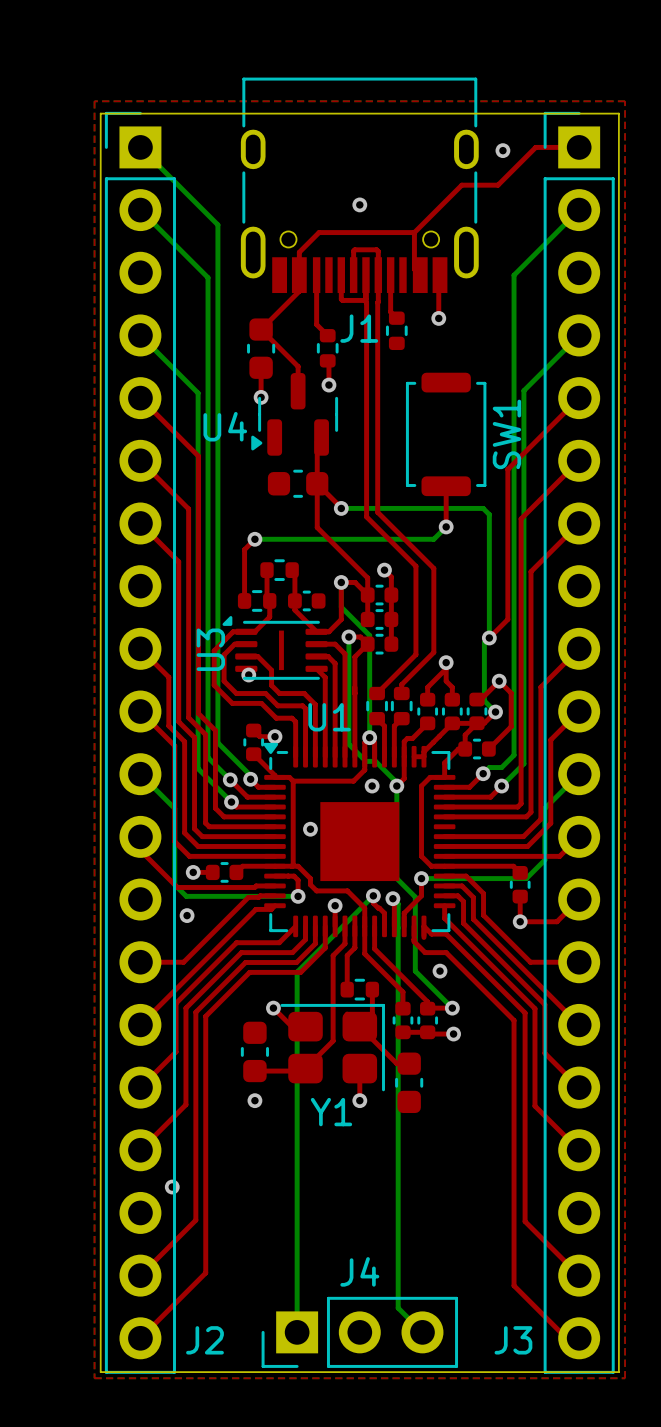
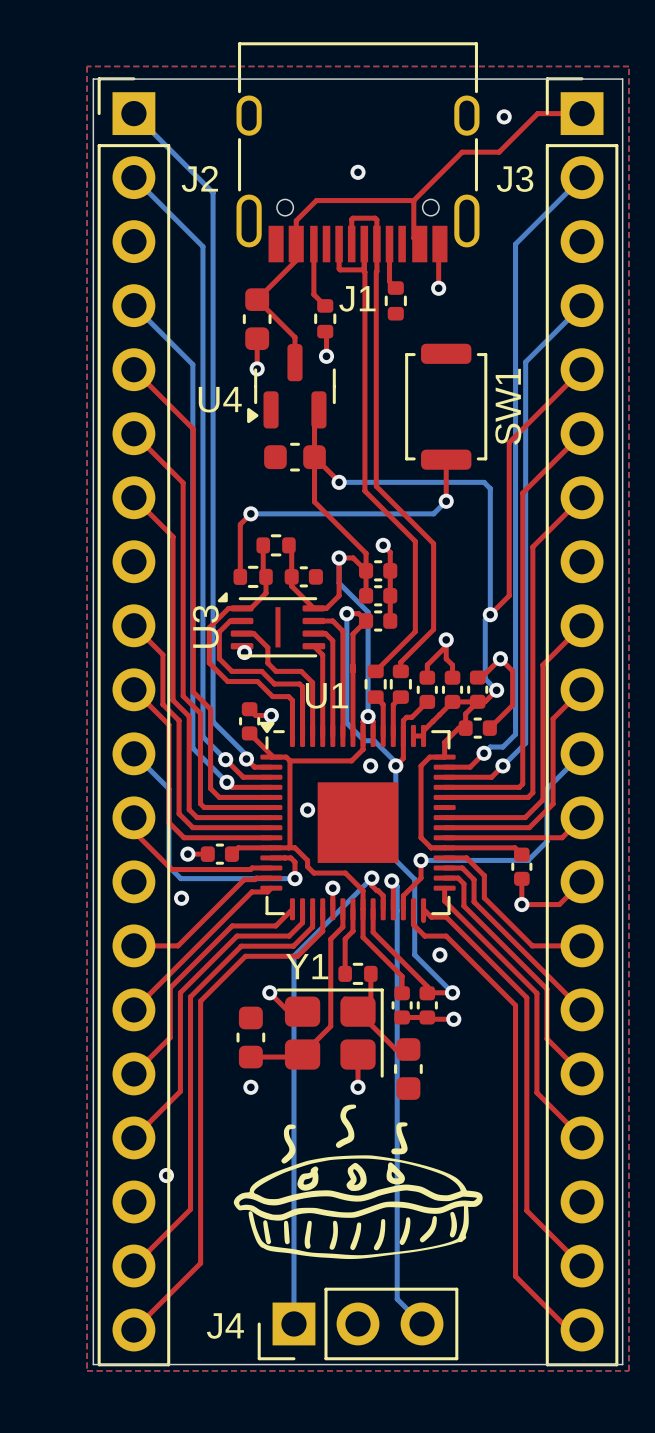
Y1 name position: Y1 (331, 1112) -> Y1 (307, 966)
drawing: none -> [233, 1104, 483, 1260]
J4 name position: J4 (359, 1271) -> J4 (225, 1325)
J2 name position: J2 (204, 1340) -> J2 (199, 178)
J3 name position: J3 (513, 1340) -> J3 (515, 178)

